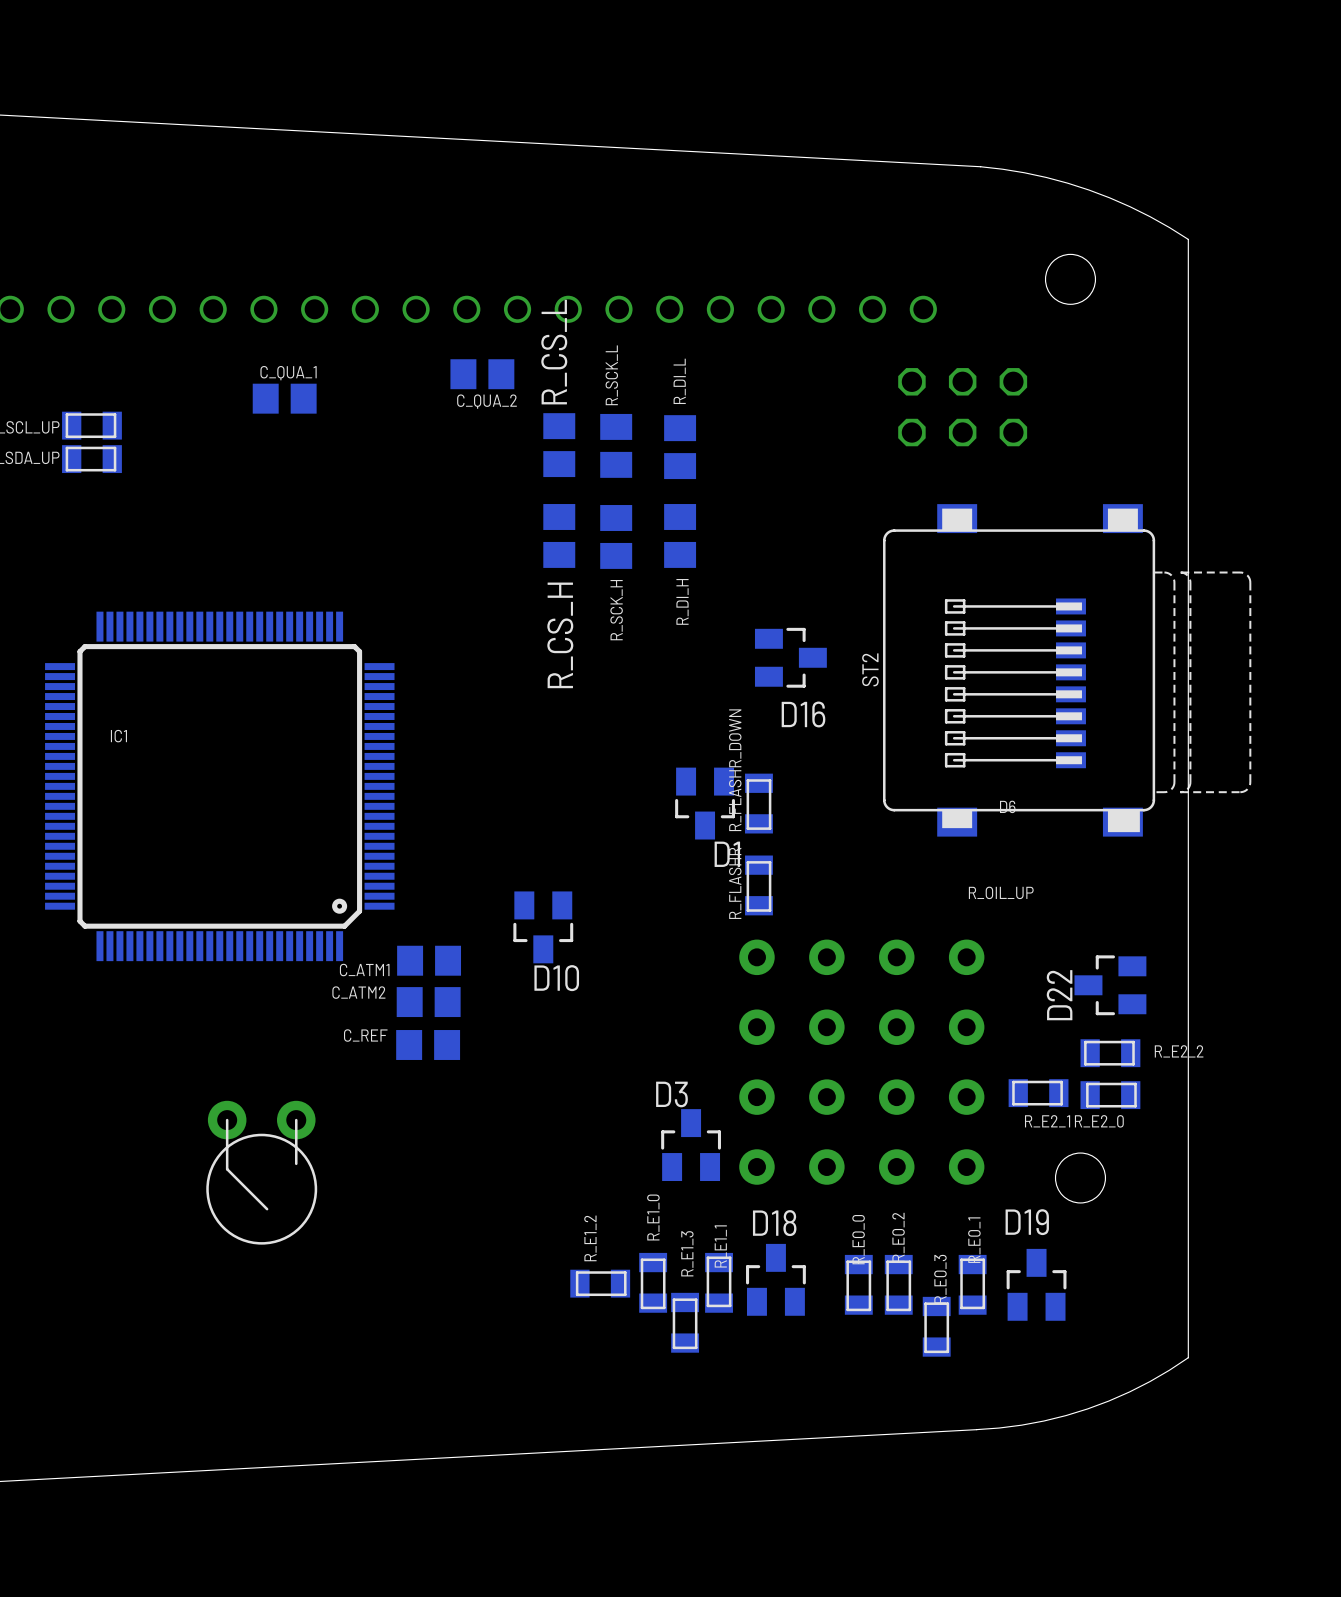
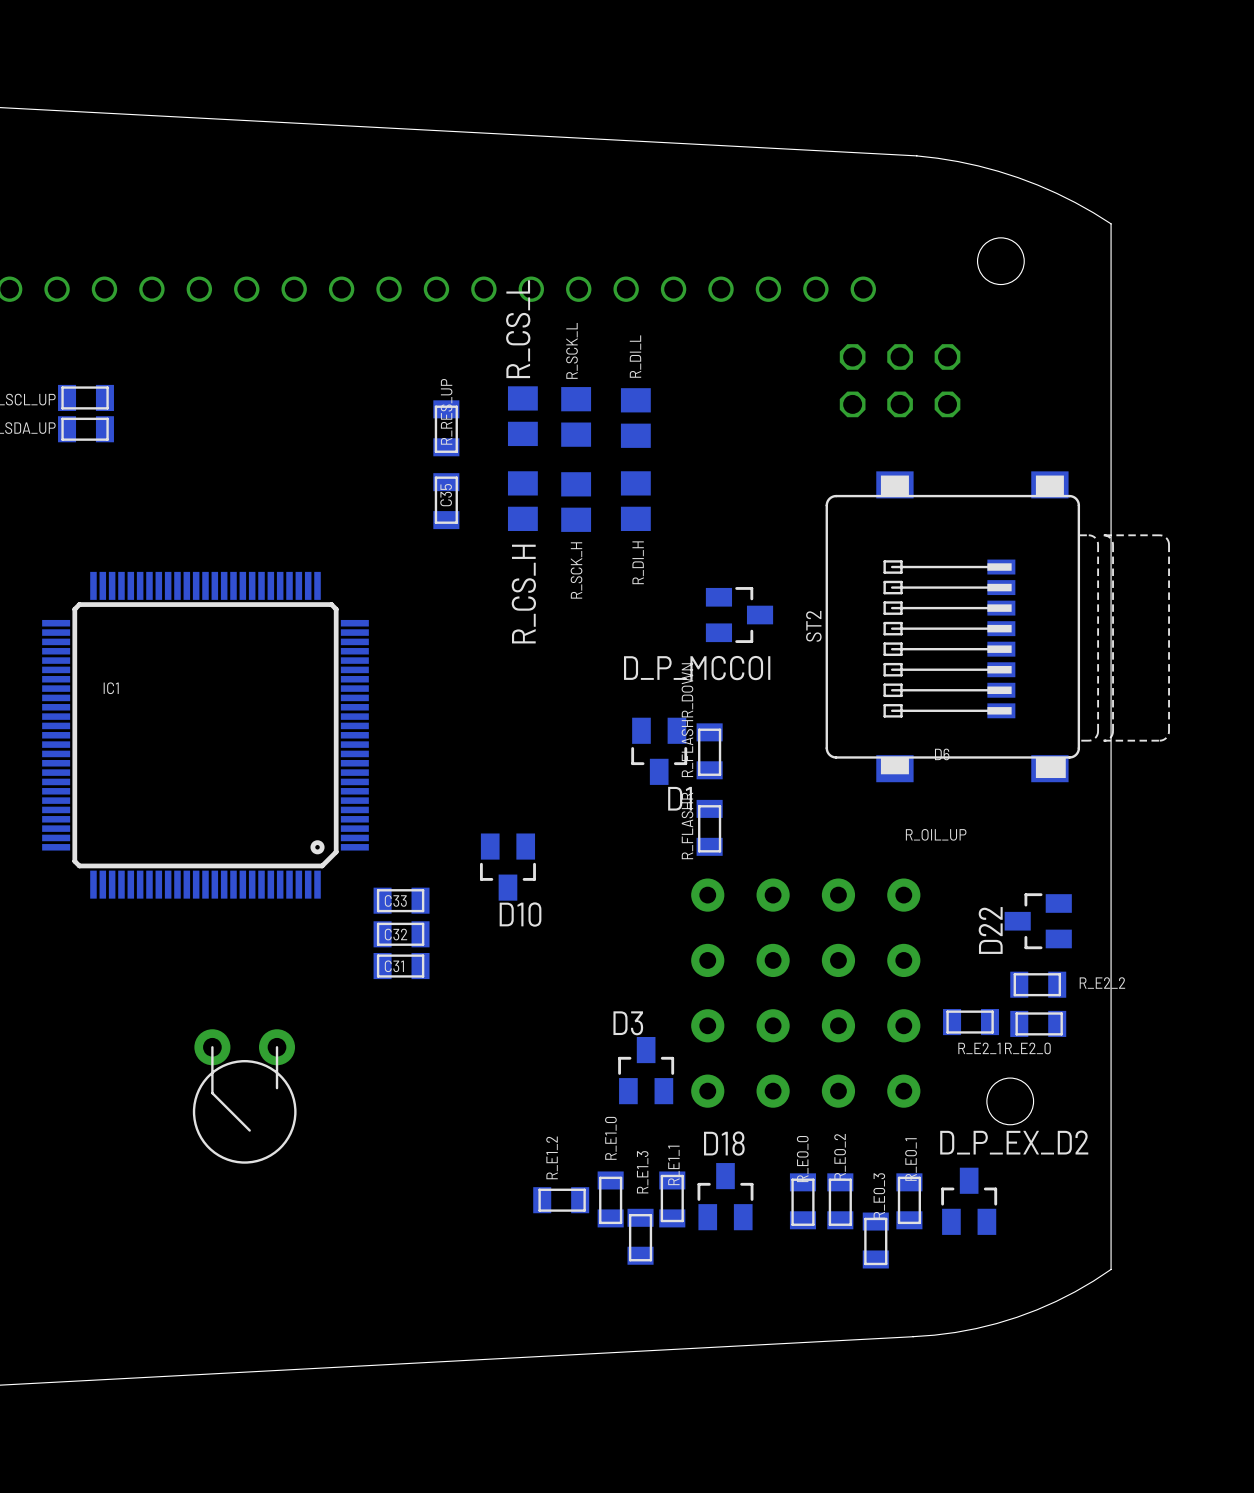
C_QUA_2: (482, 374) -> none
C_QUA_1: (284, 398) -> none
R_RES_UP: none -> (446, 428)
C35: none -> (446, 501)
D16 name: D16 (803, 714) -> D_P_MCCOI (697, 668)
C_ATM1: (429, 960) -> none
C33: none -> (401, 900)
C32: none -> (401, 934)
C_ATM2: (428, 1002) -> none
C31: none -> (401, 966)
C_REF: (428, 1045) -> none
D19 name: D19 (1027, 1222) -> D_P_EX_D2 (1014, 1142)

